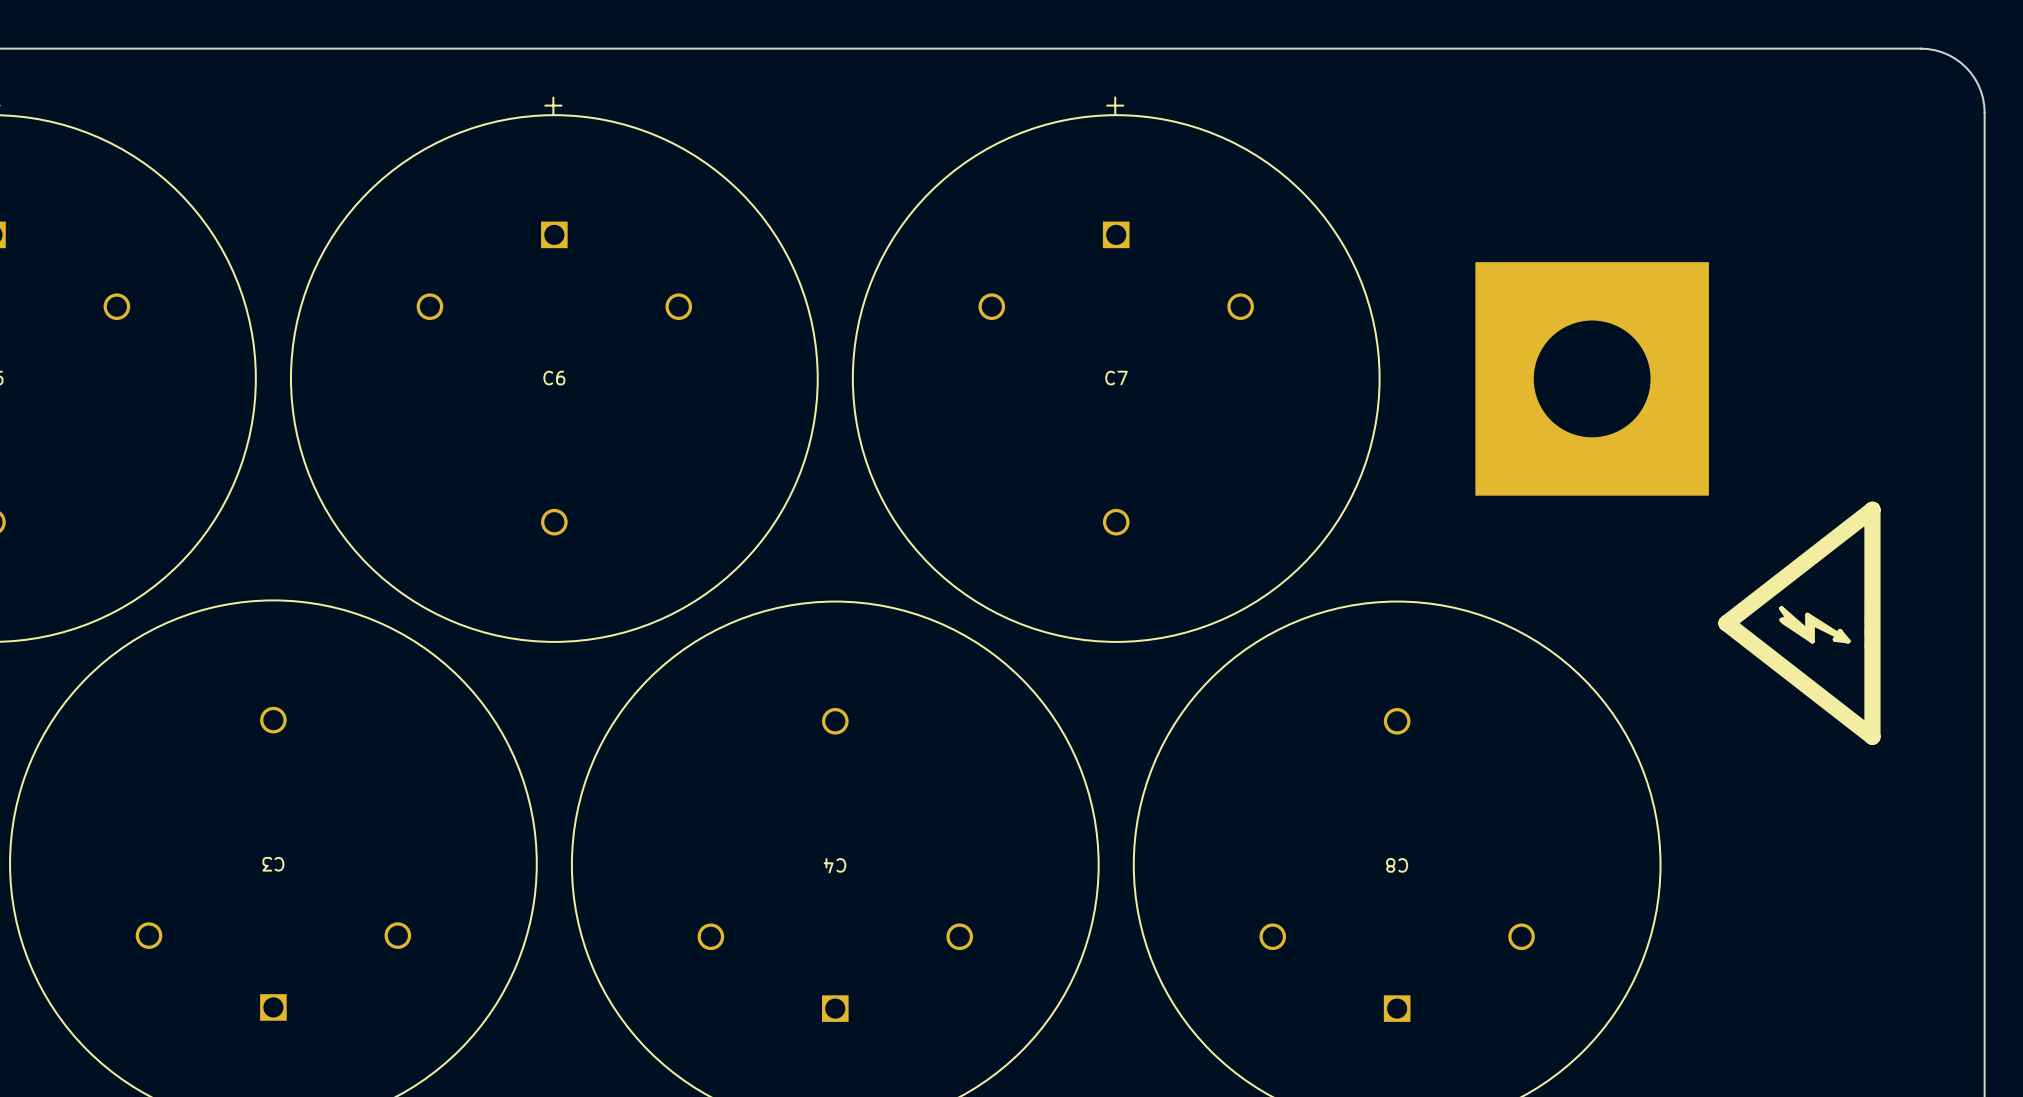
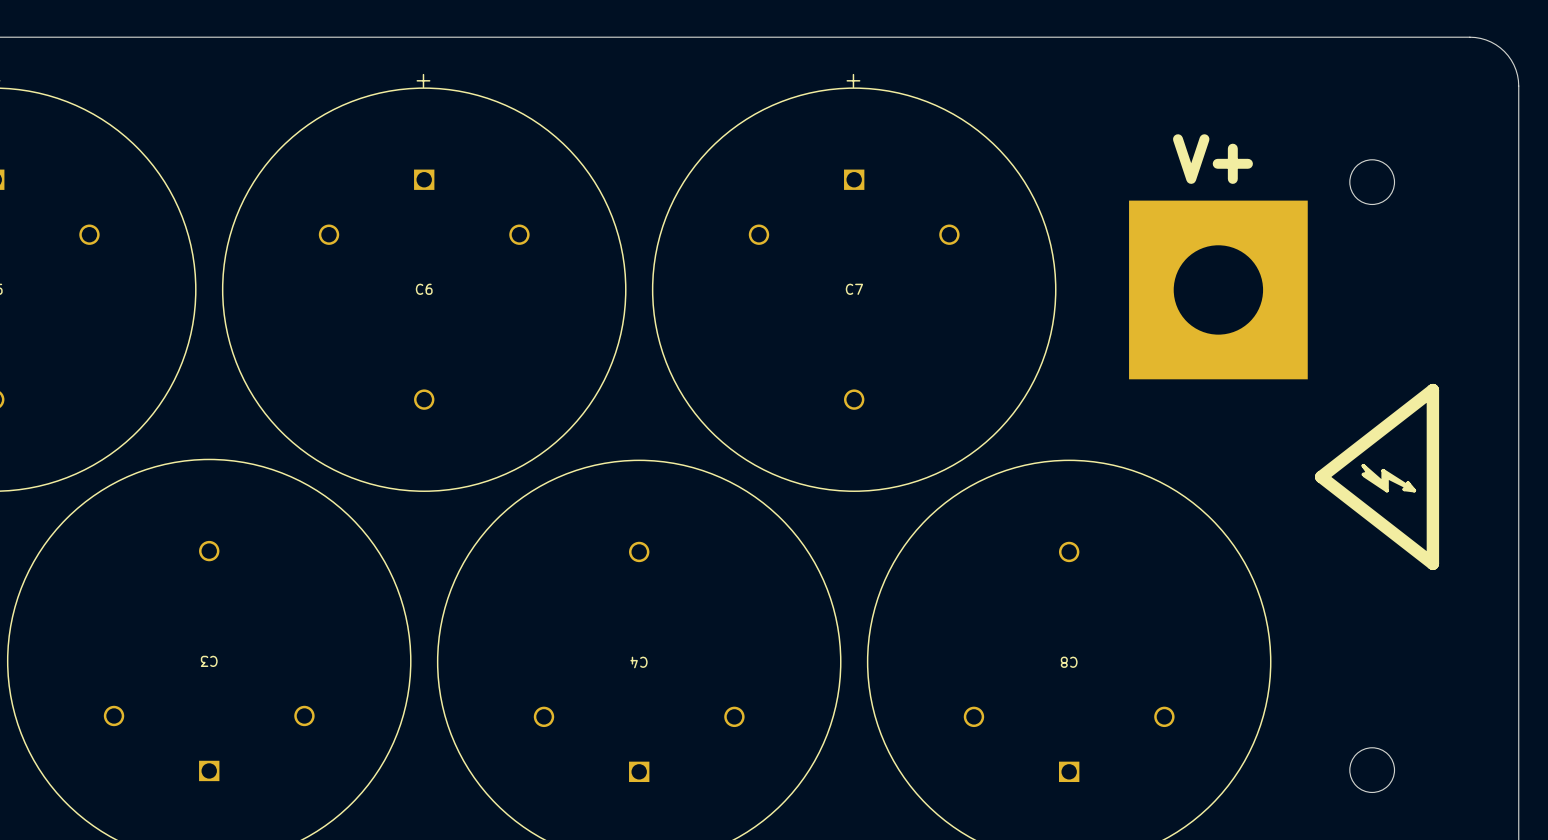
text: none -> V+ (1212, 159)
round board edge: none -> [1349, 159, 1395, 205]
round board edge: none -> [1349, 747, 1395, 793]

